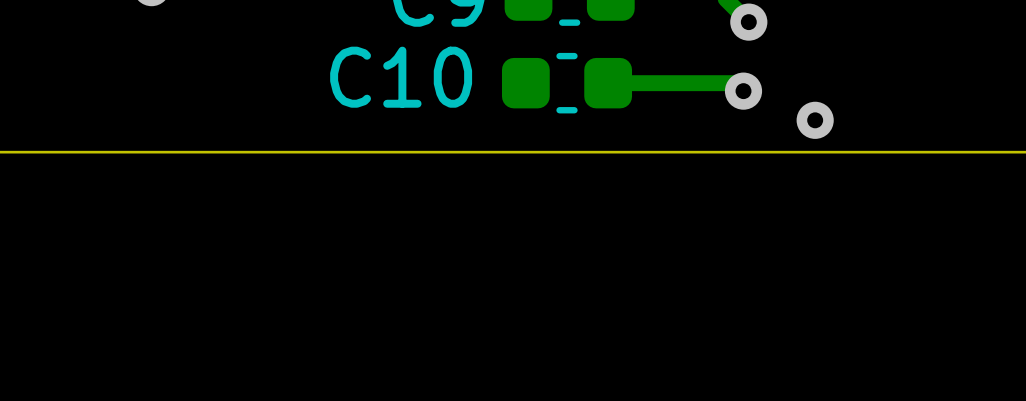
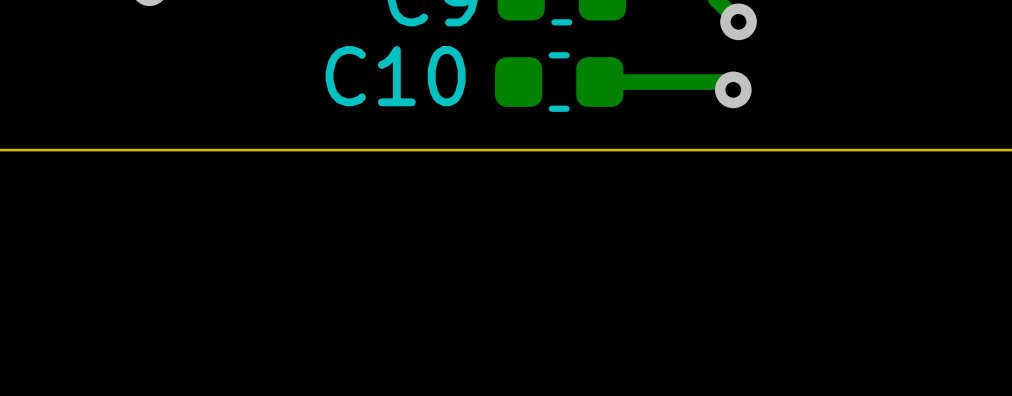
via: (815, 120) -> none

